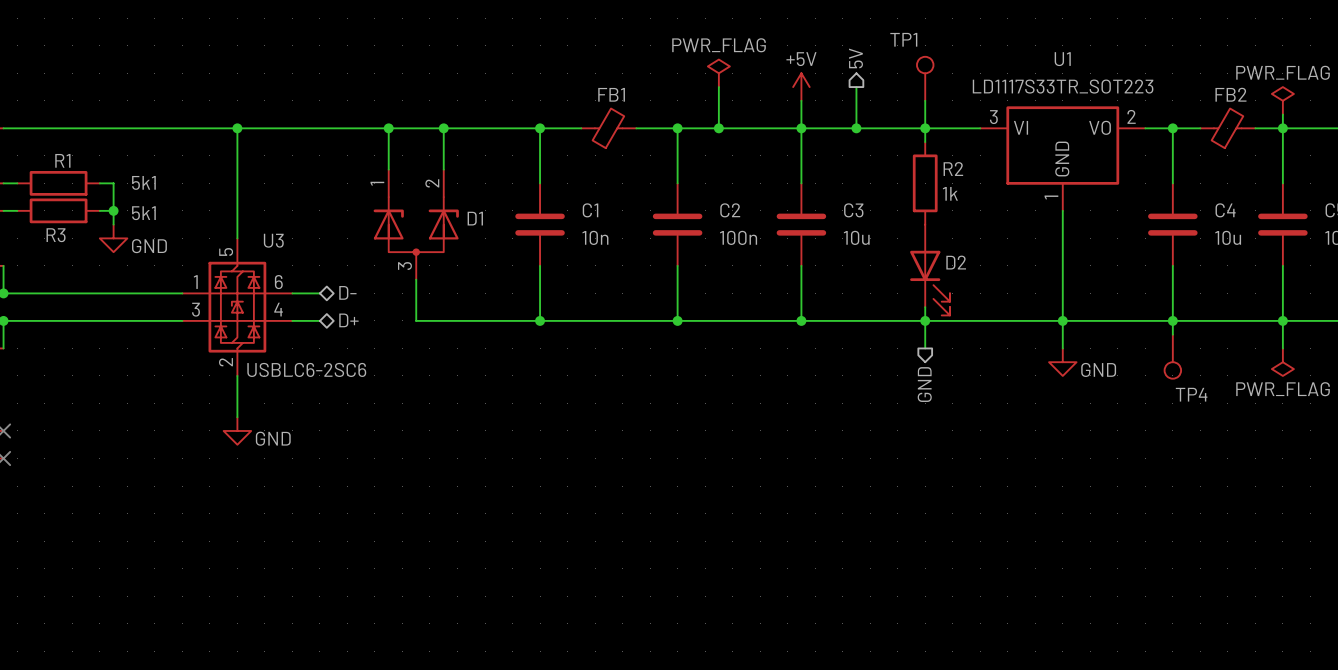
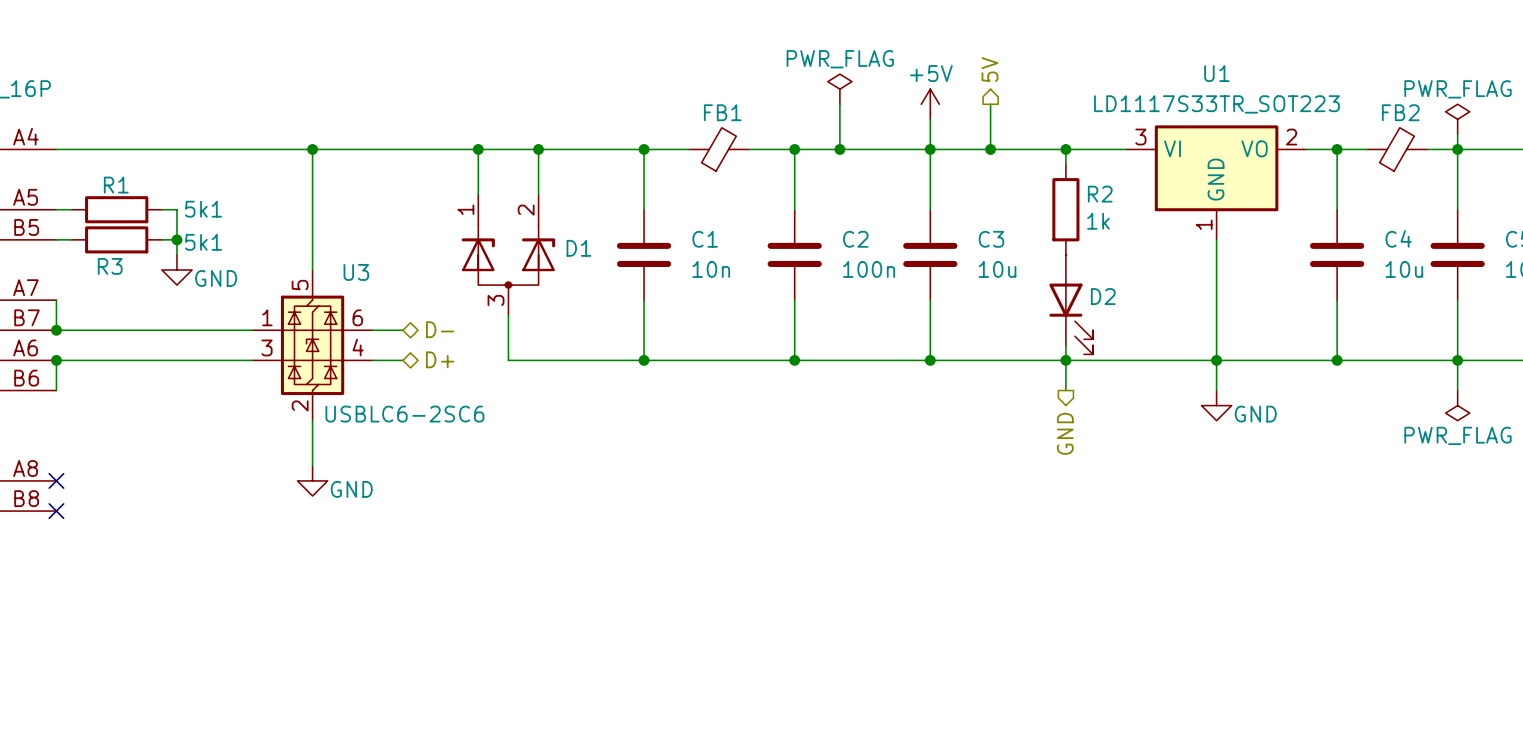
TP1: (925, 78) -> none
wire: (925, 100) (925, 128) -> none
wire: (1172, 320) (1172, 334) -> none
TP4: (1172, 356) -> none

